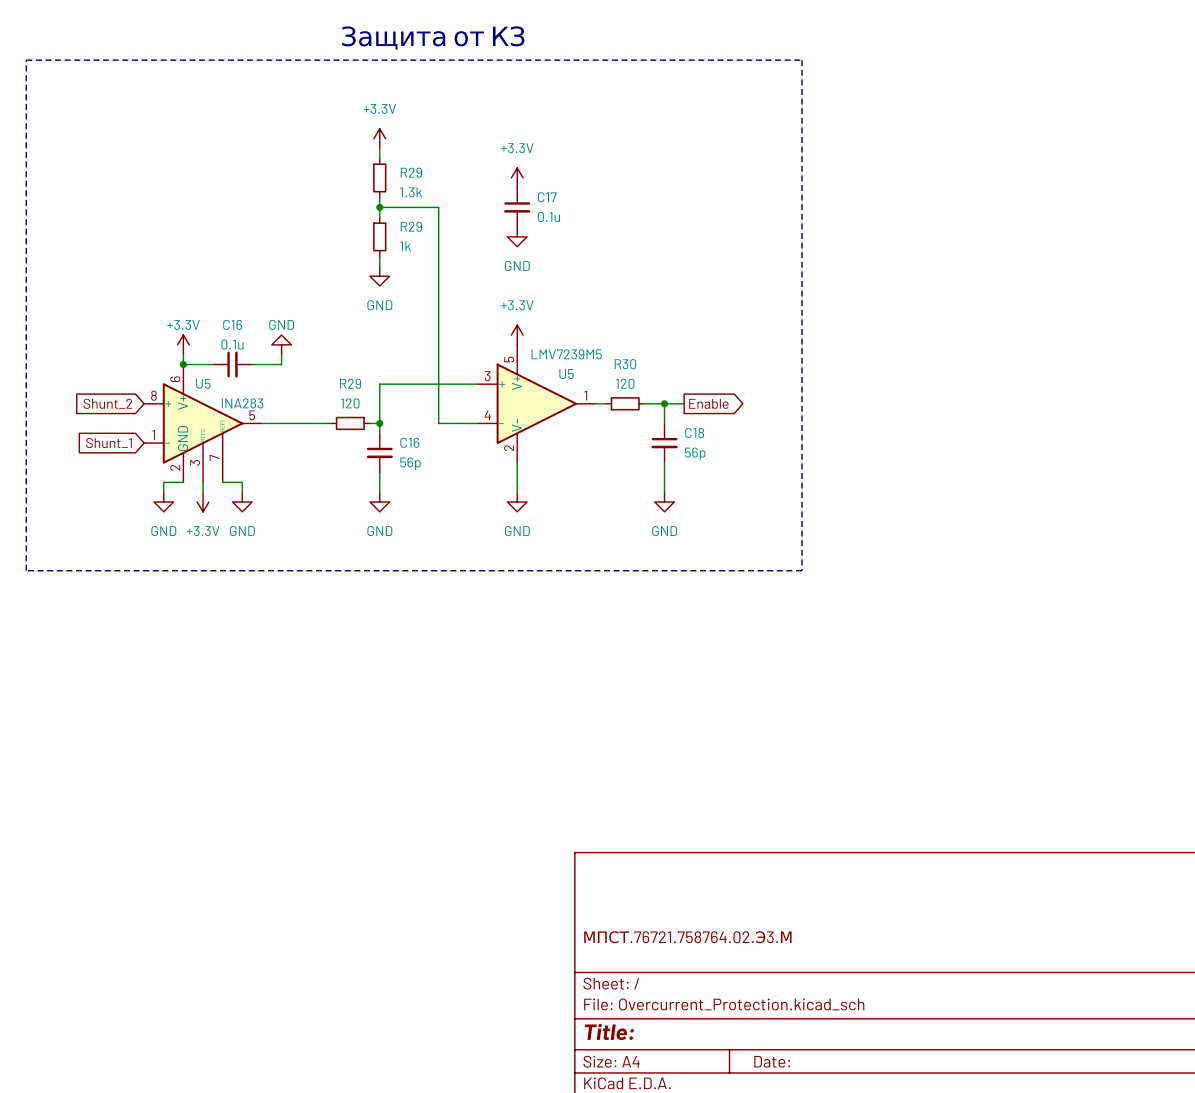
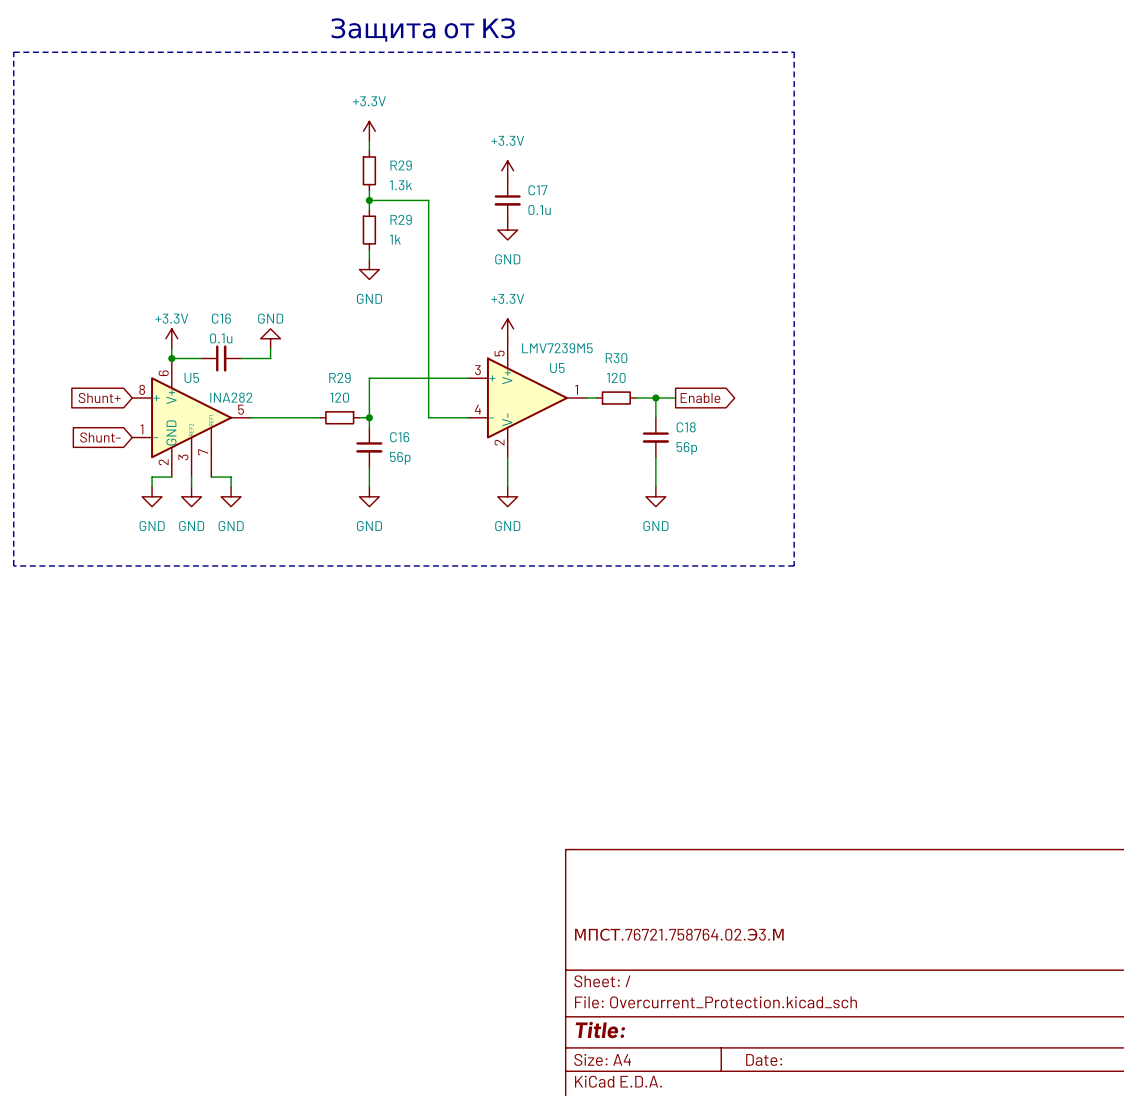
global label: Shunt_2 (107, 403) -> Shunt+ (99, 398)
U5 value: INA283 (242, 403) -> INA282 (231, 397)
global label: Shunt_1 (108, 443) -> Shunt- (100, 437)
power symbol: +3.3V (203, 501) -> GND (191, 496)

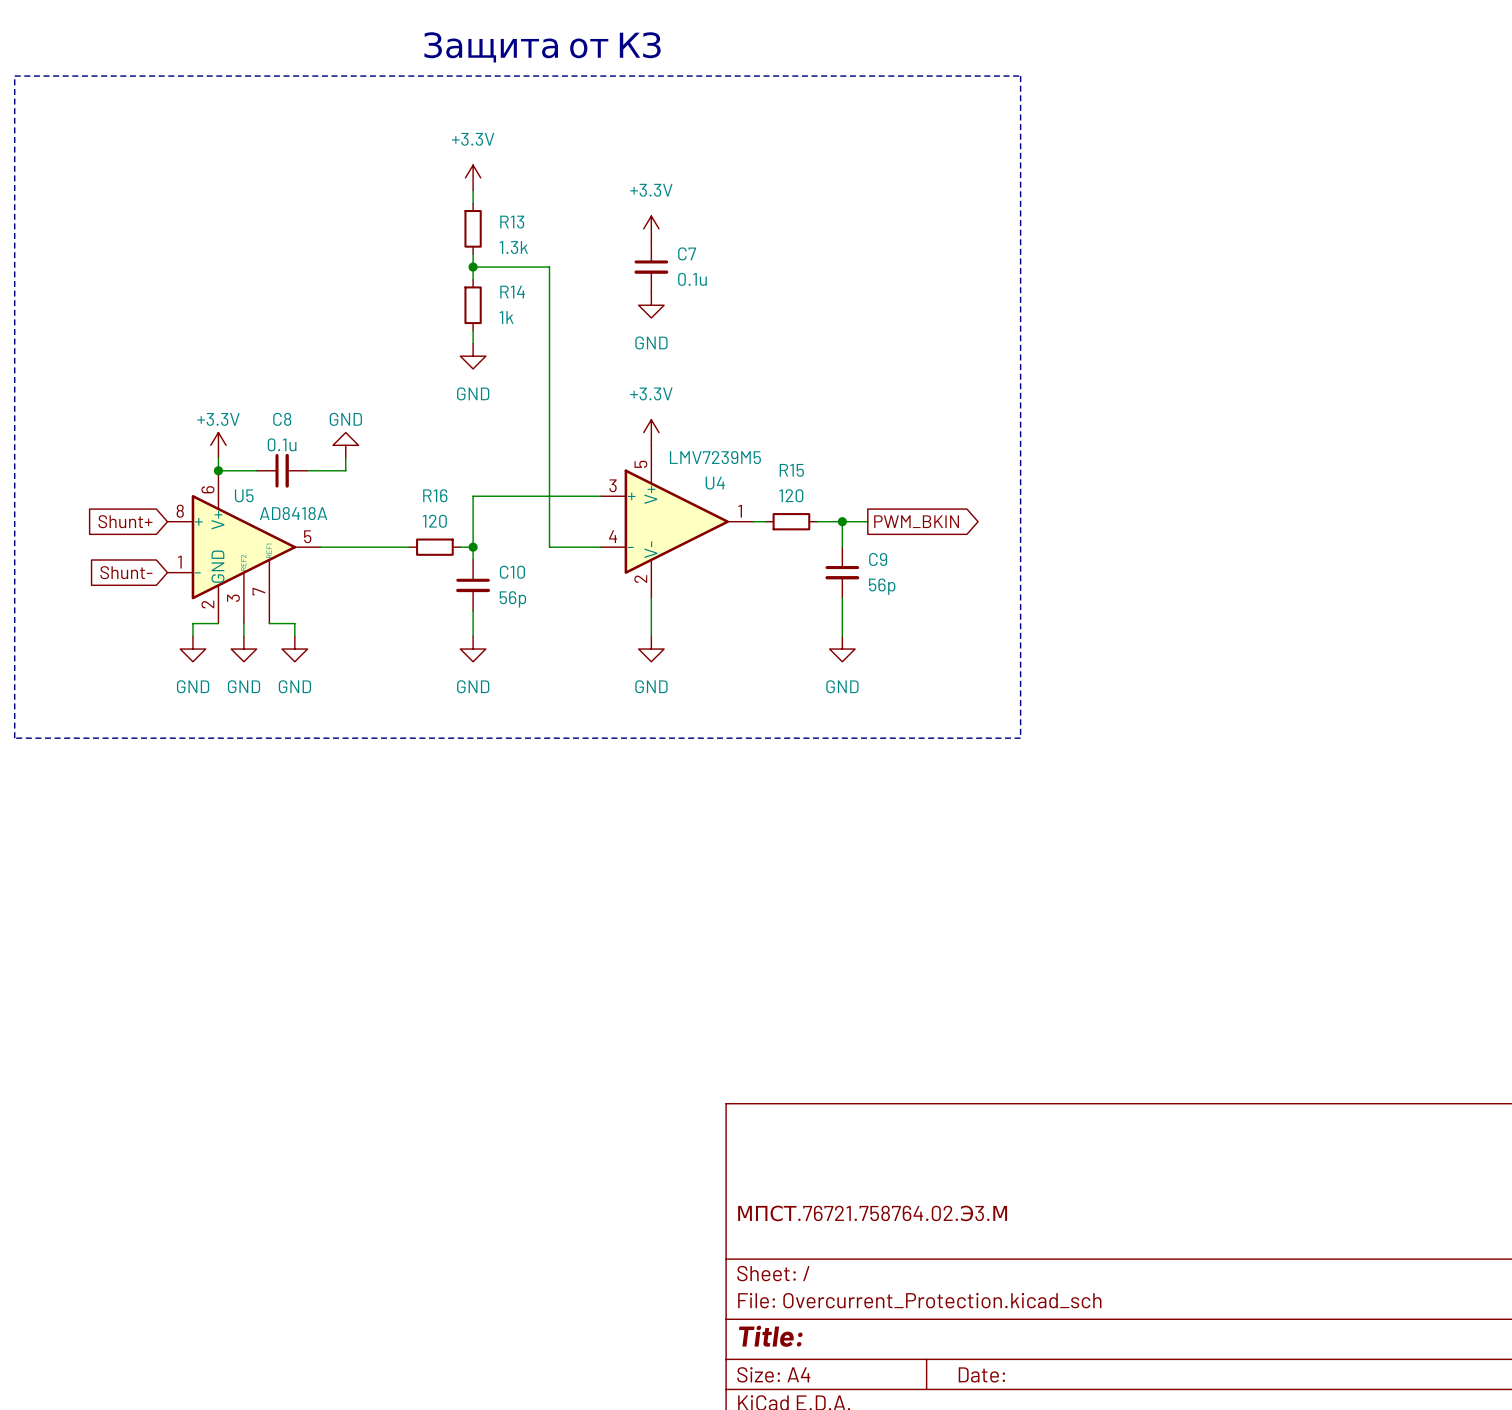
R29 name: R29 (401, 165) -> R13 (512, 222)
C17 name: C17 (537, 190) -> C7 (687, 253)
R29 name: R29 (401, 219) -> R14 (512, 292)
C16 name: C16 (221, 318) -> C8 (282, 419)
R30 name: R30 (616, 358) -> R15 (791, 470)
U5 name: U5 (557, 368) -> U4 (715, 483)
R29 name: R29 (339, 377) -> R16 (435, 495)
U5 value: INA282 (231, 397) -> AD8418A (293, 513)
global label: Enable (700, 398) -> PWM_BKIN (916, 521)
C18 name: C18 (686, 427) -> C9 (878, 559)
C16 name: C16 (399, 437) -> C10 (512, 572)

